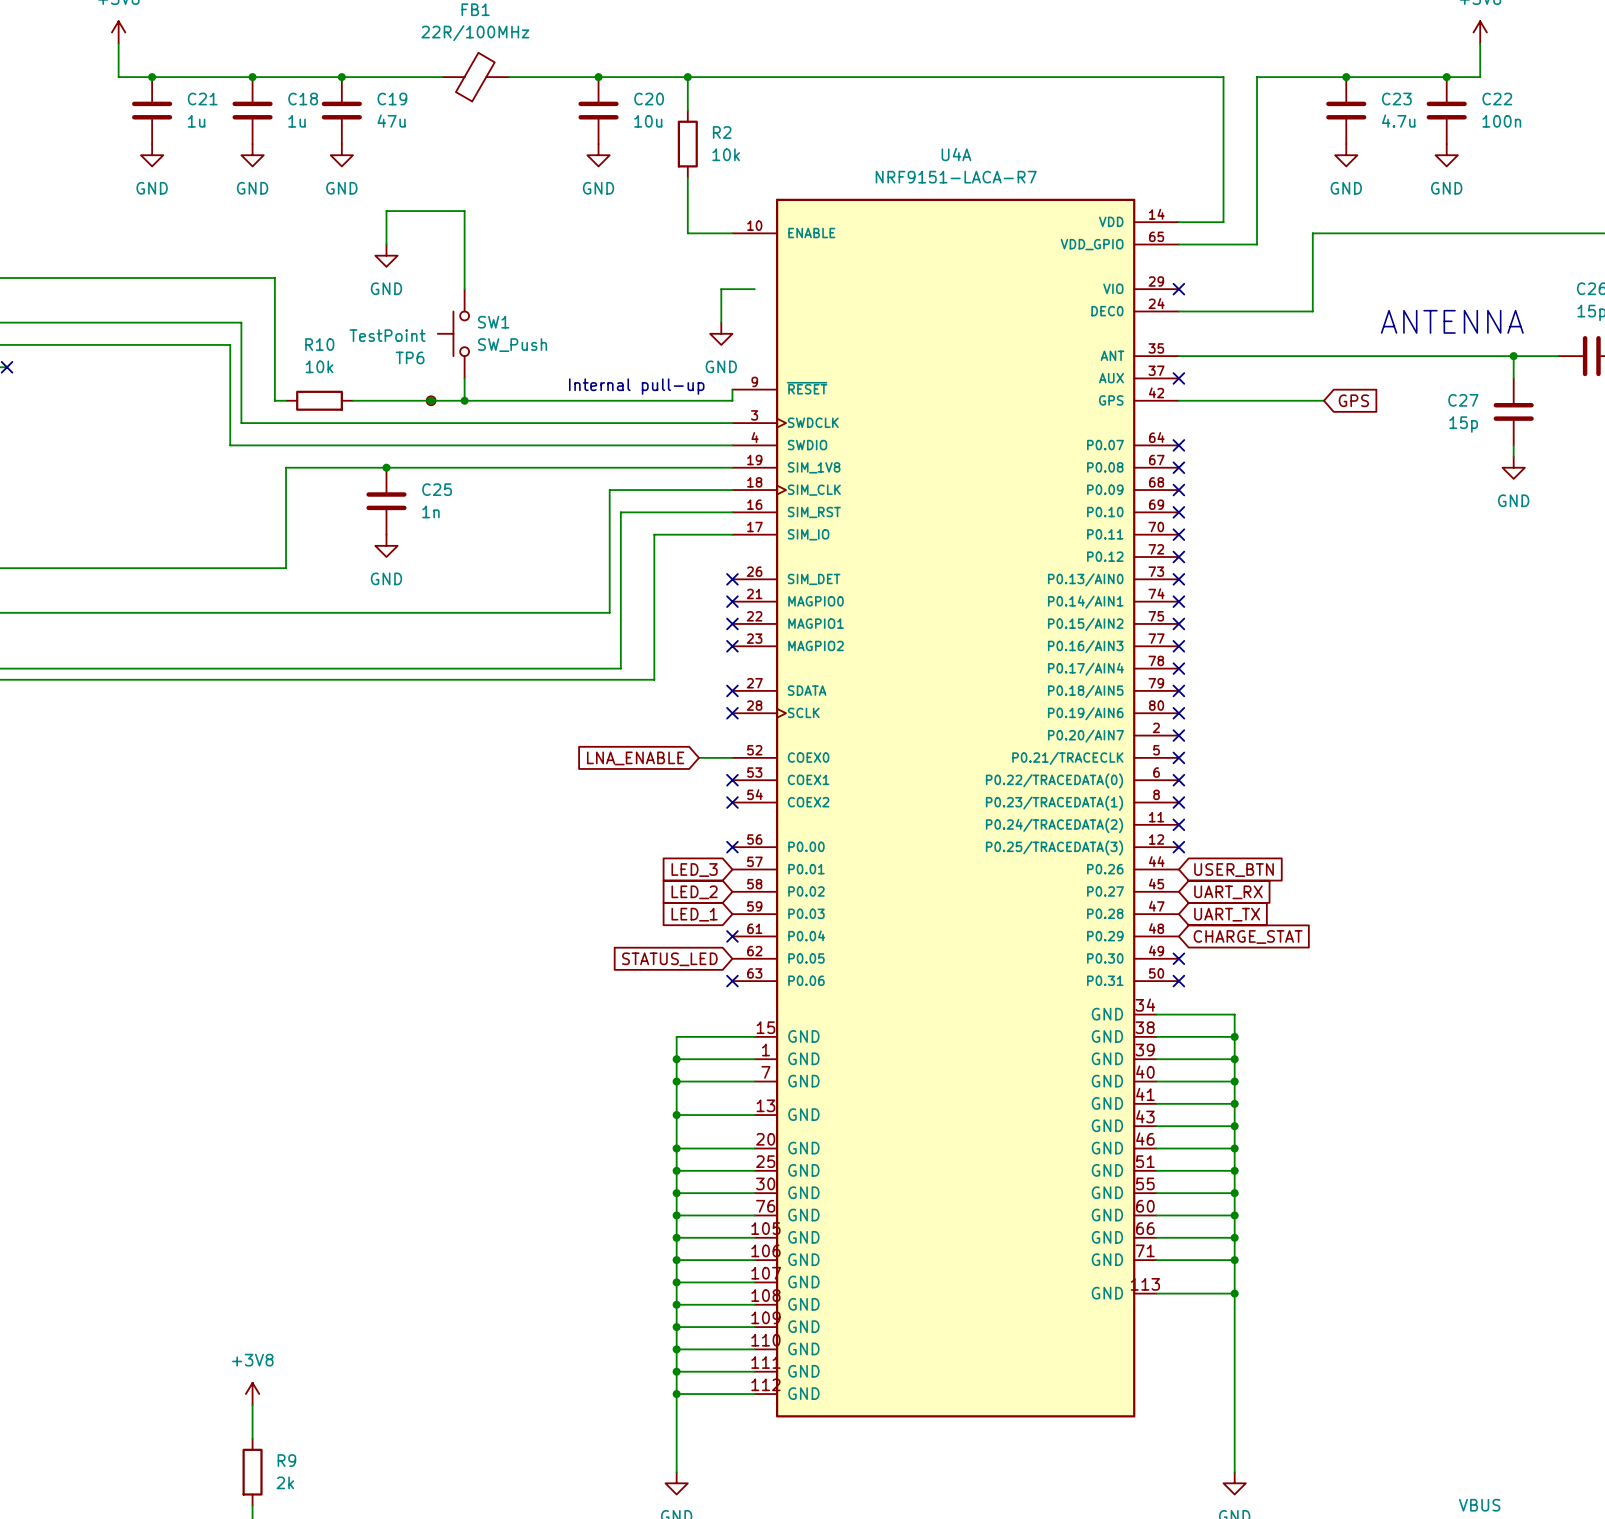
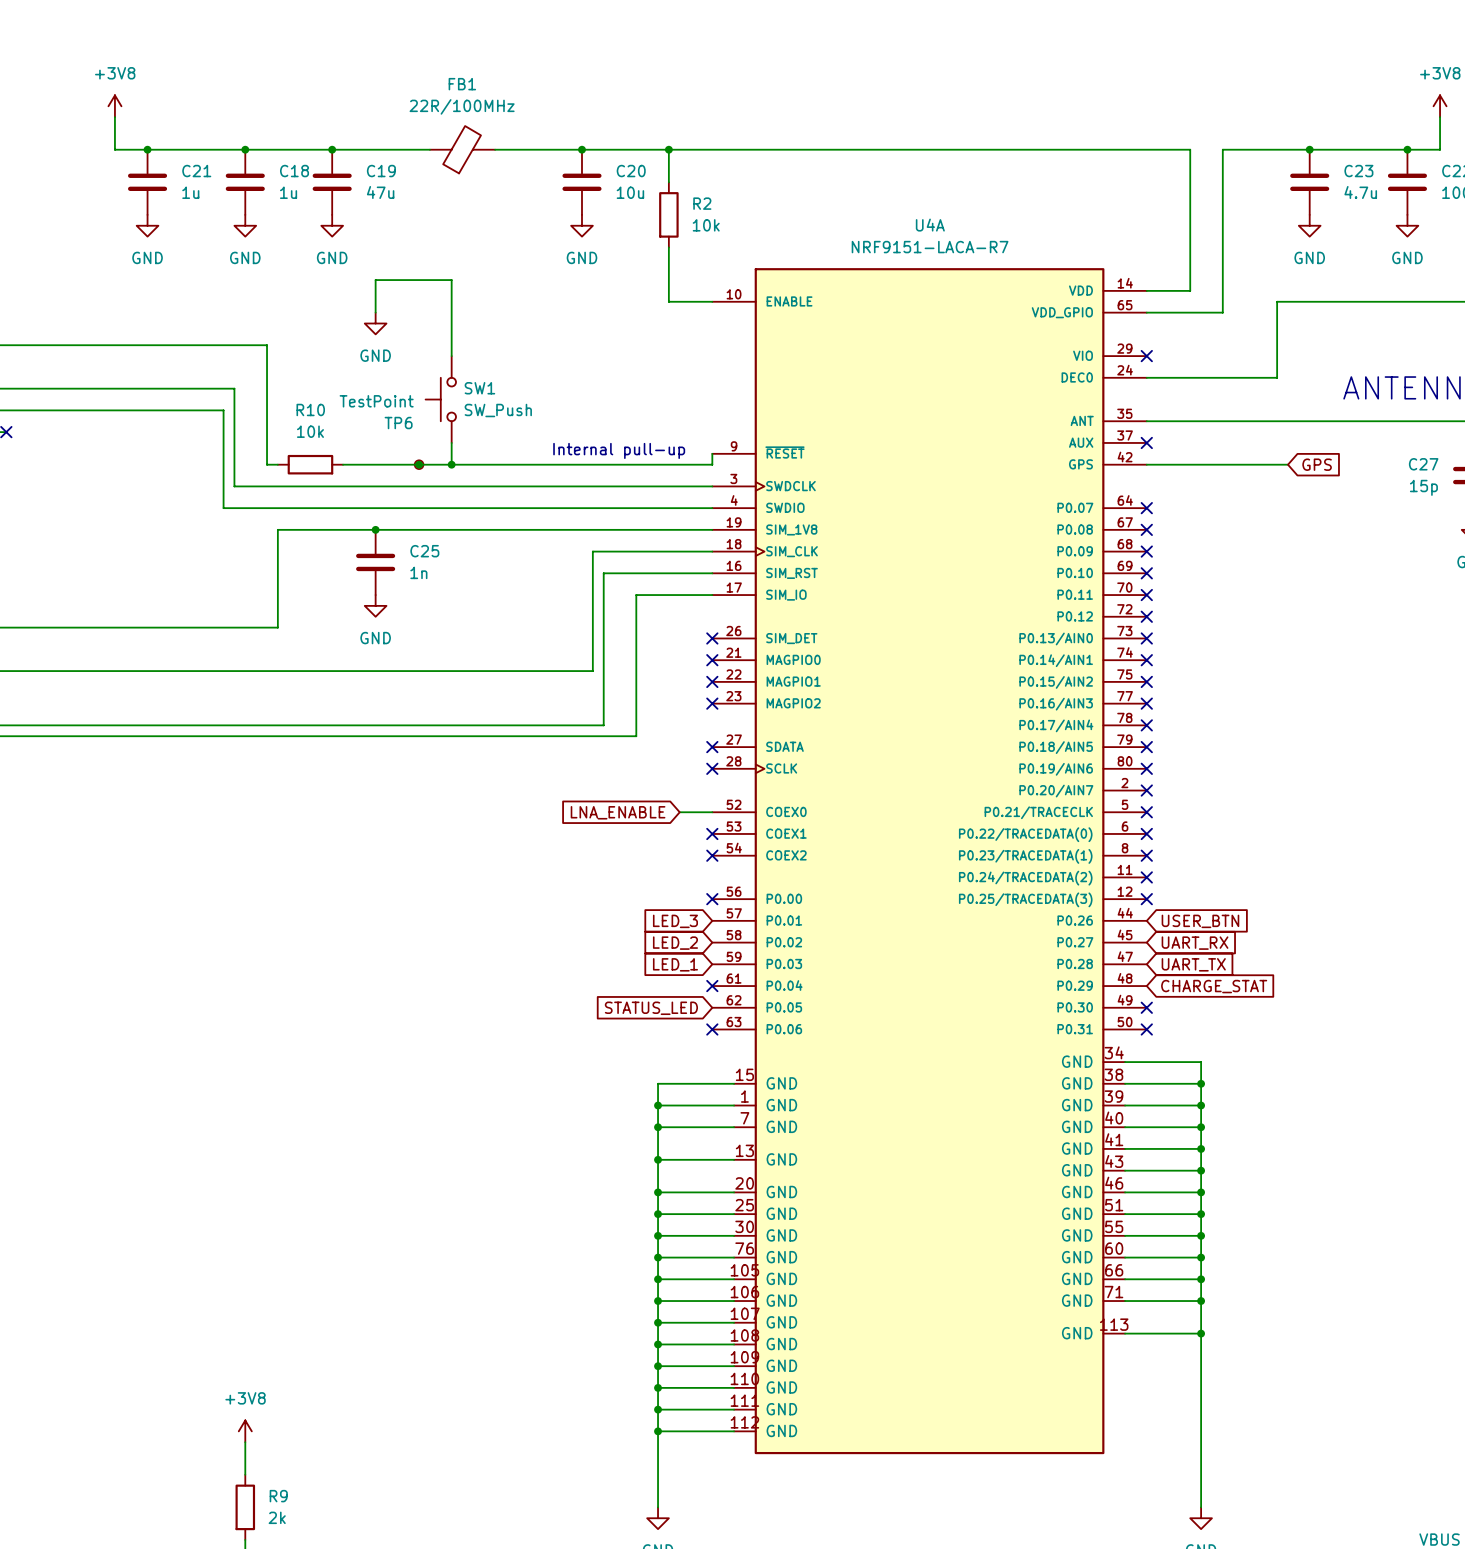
wire: (754, 289) (721, 289) (721, 322) -> none
power symbol: GND (721, 333) -> none

